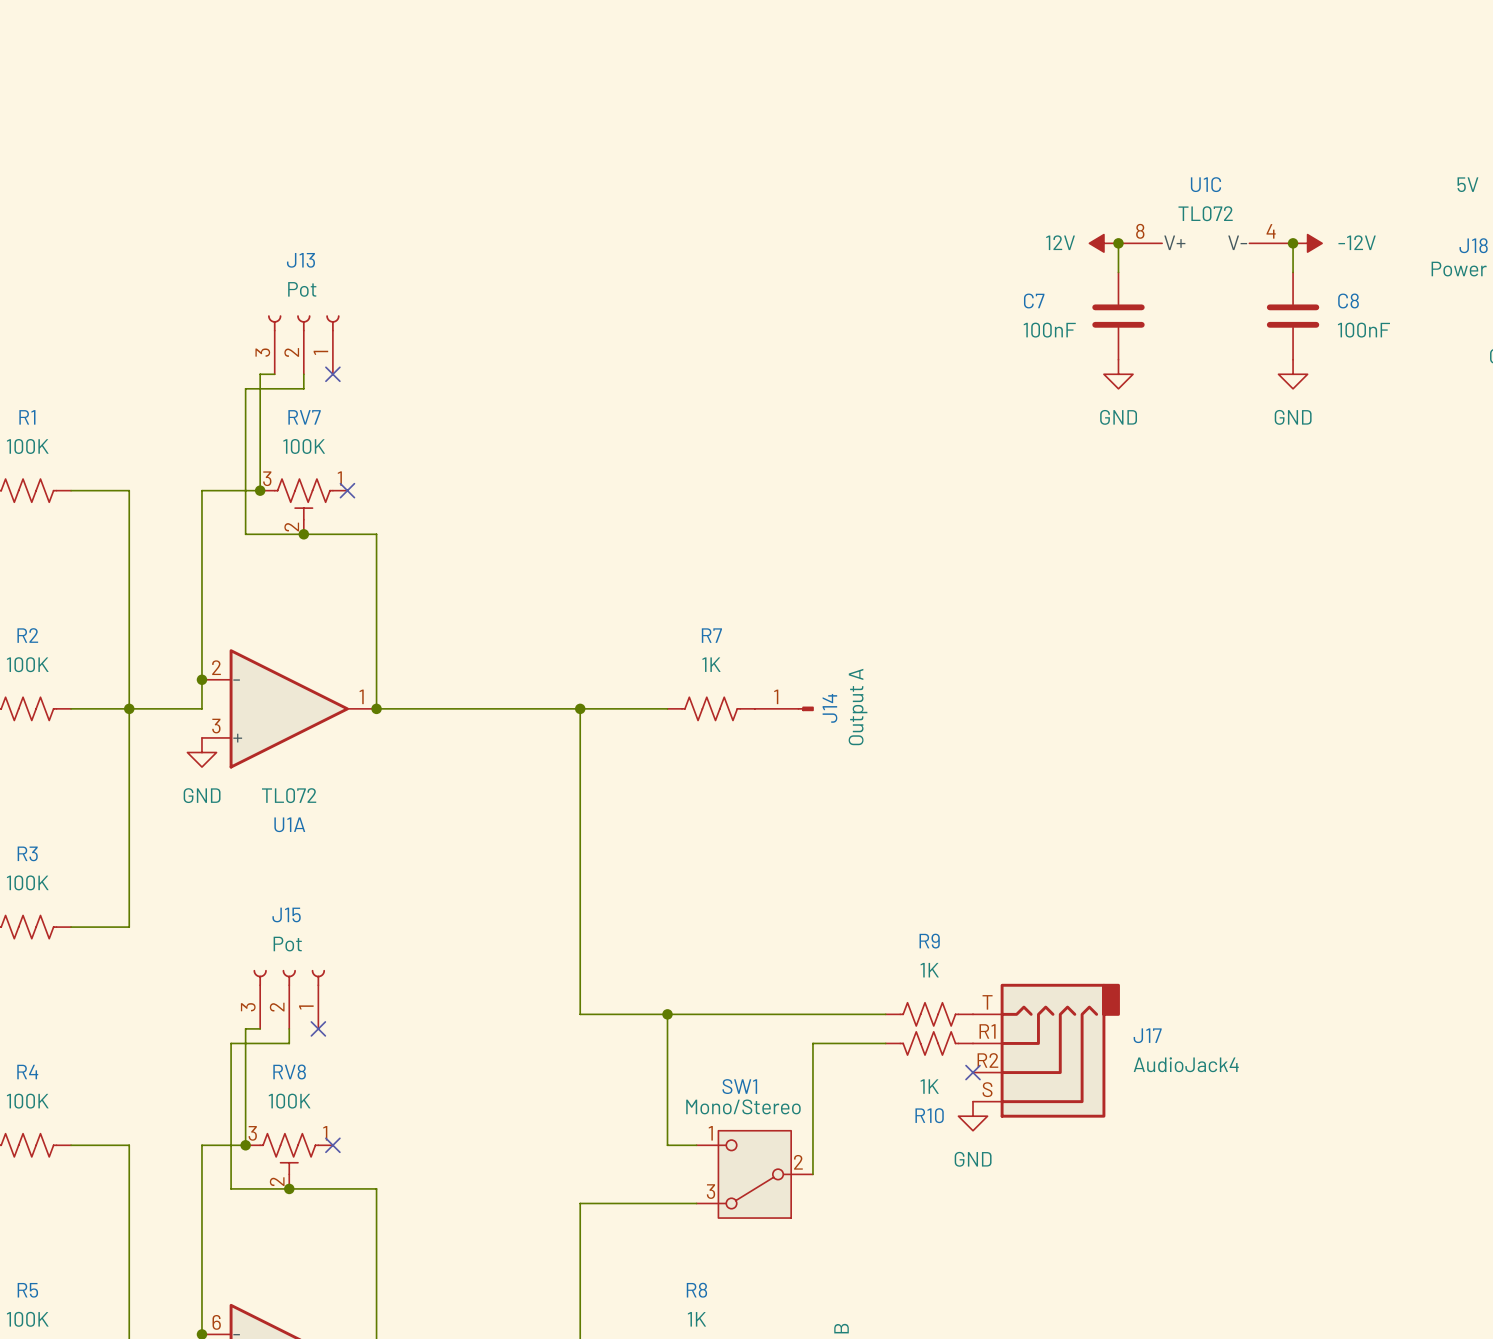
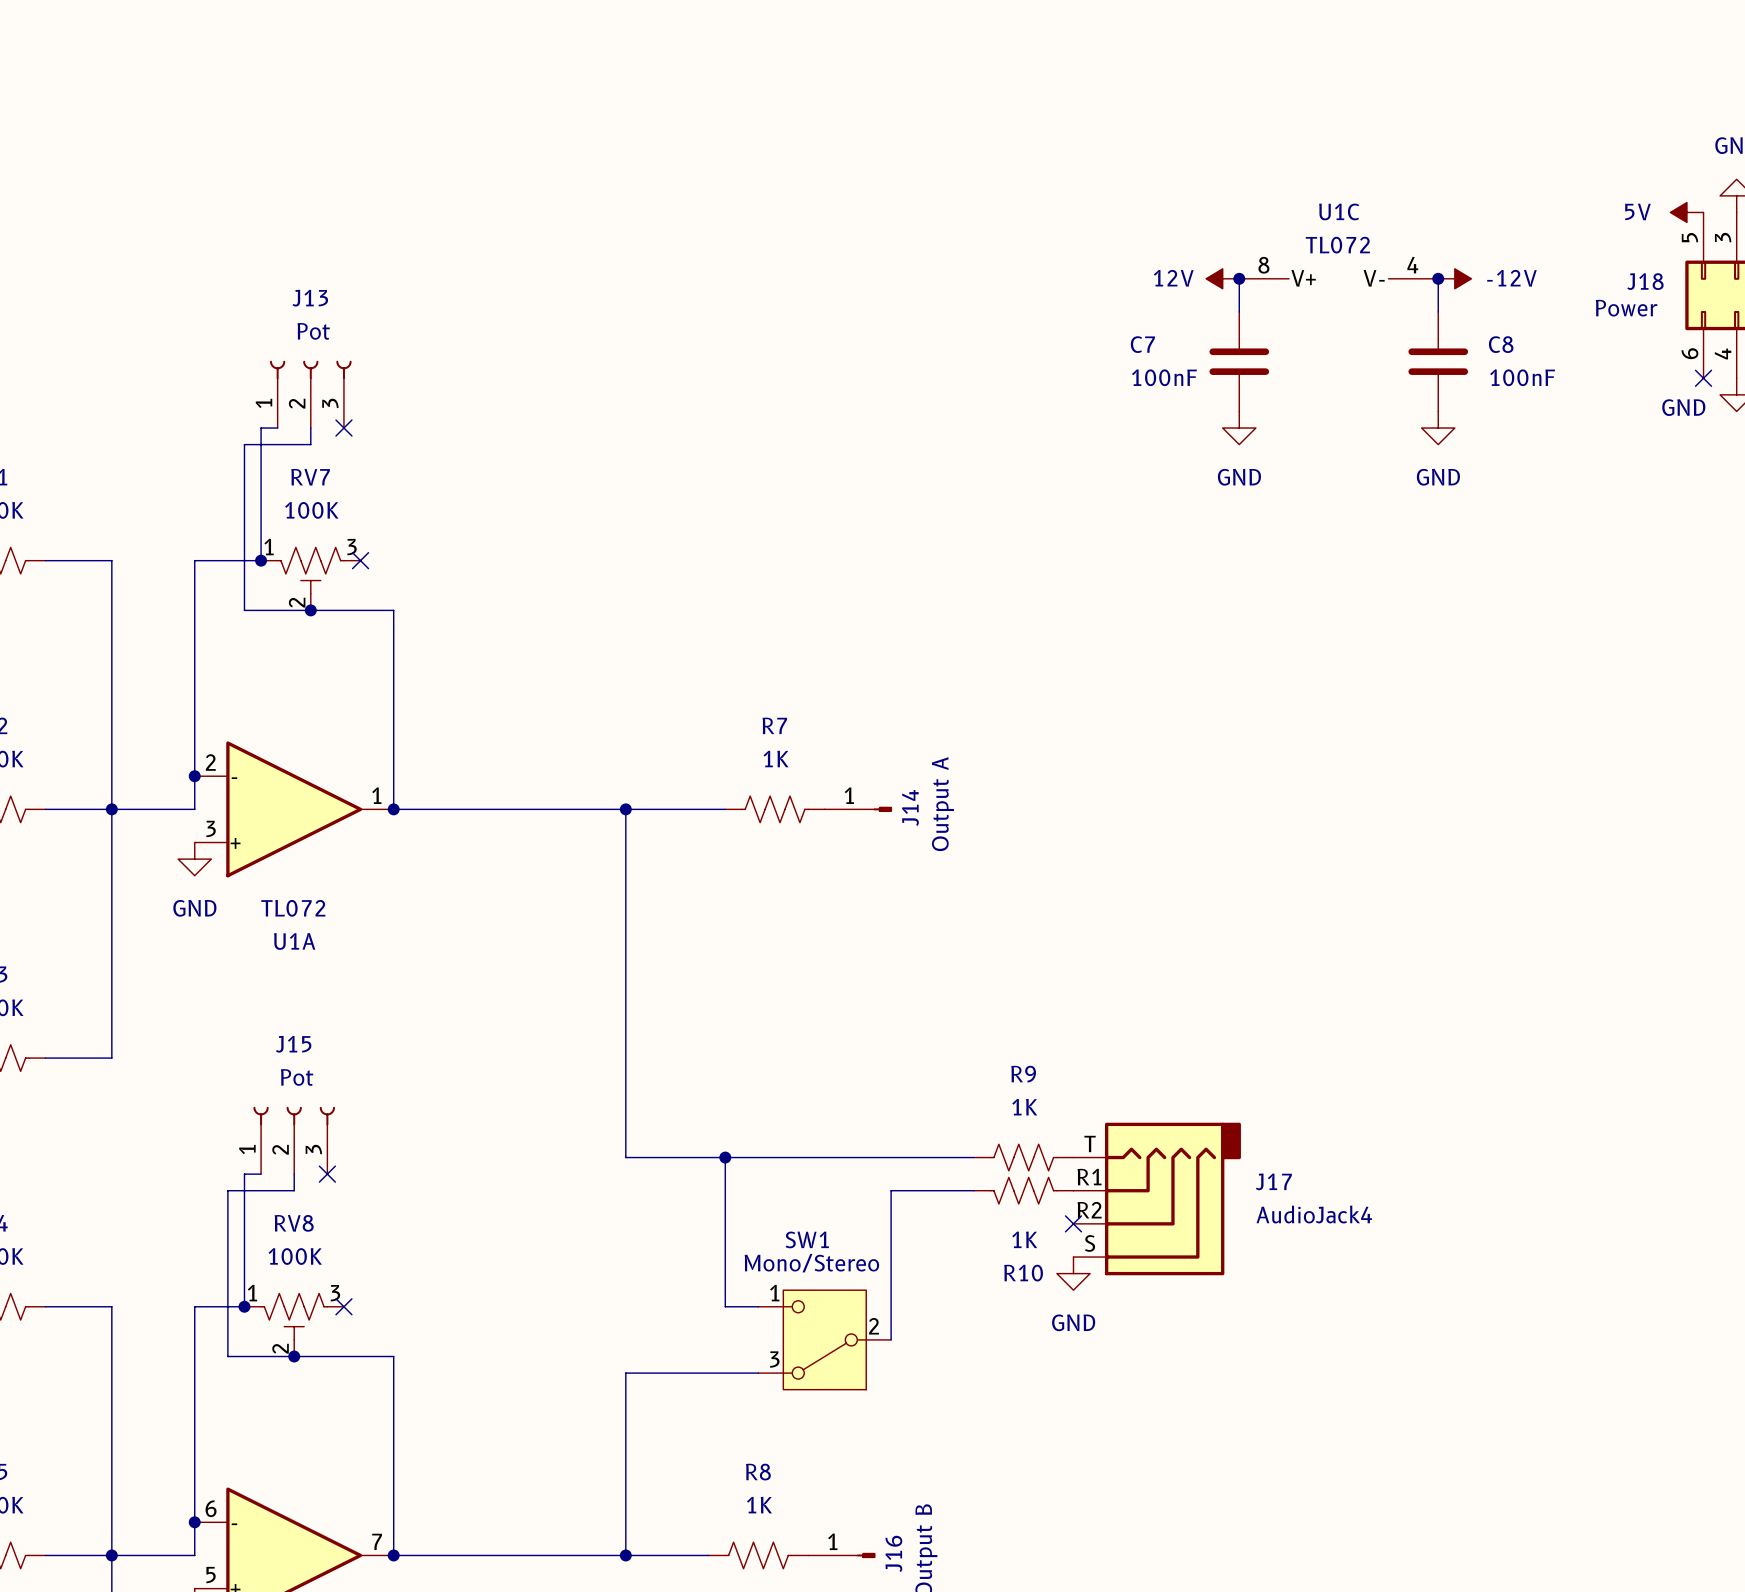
J13 flip: as is (303, 323) -> left-right (310, 369)
RV7 flip: as is (303, 499) -> left-right (310, 570)
J15 flip: as is (289, 978) -> left-right (294, 1116)
RV8 flip: as is (289, 1154) -> left-right (294, 1316)

